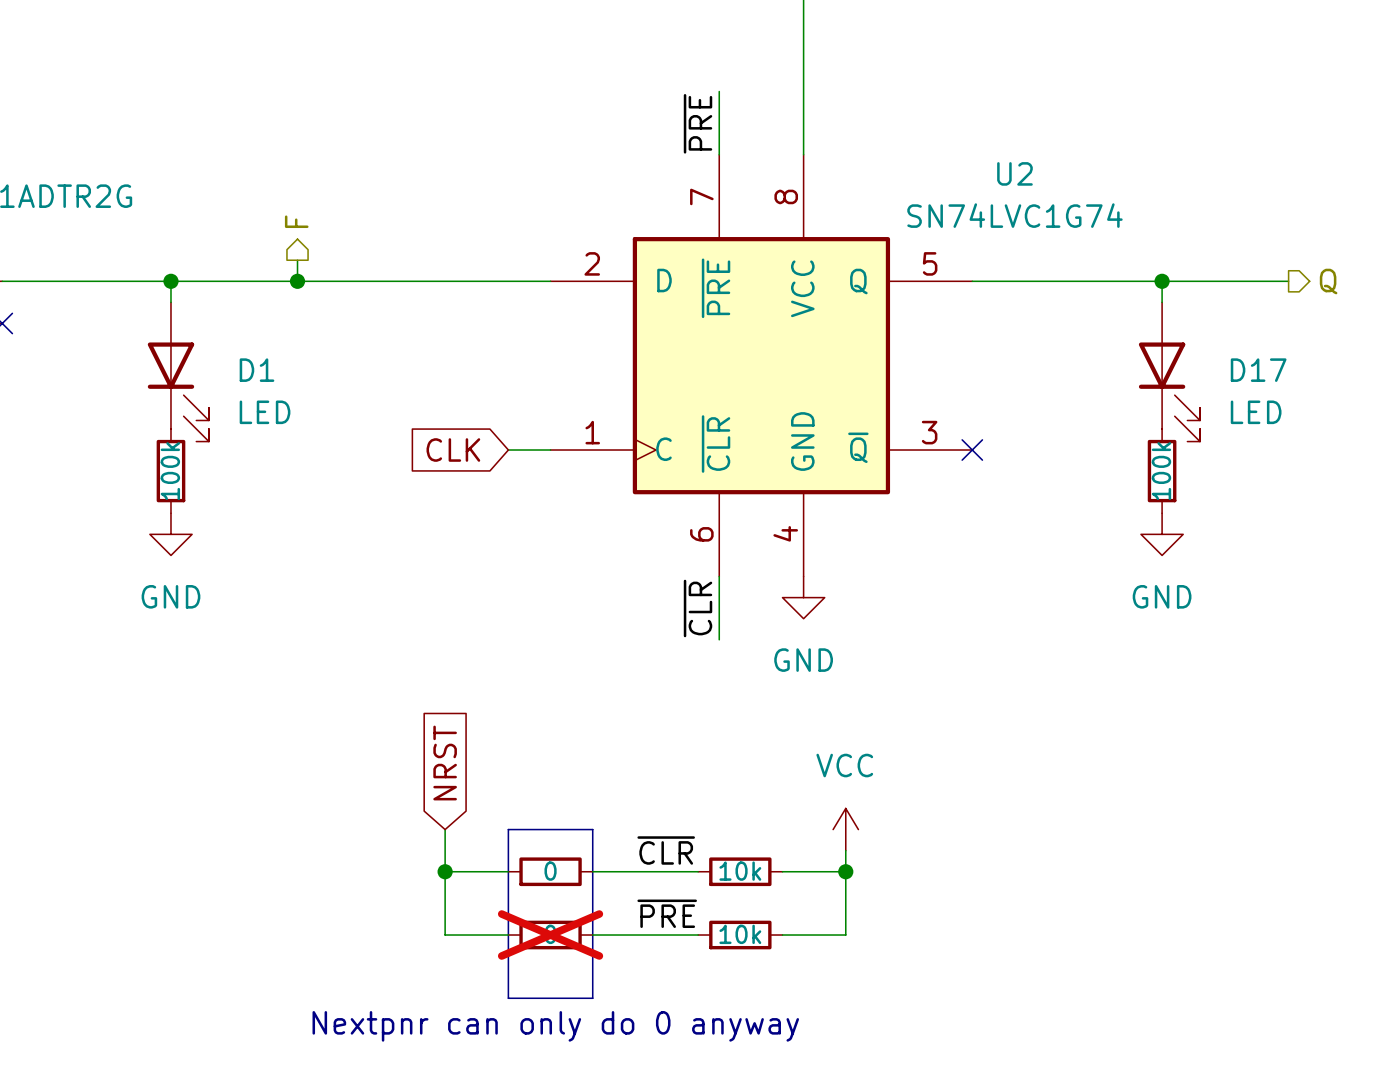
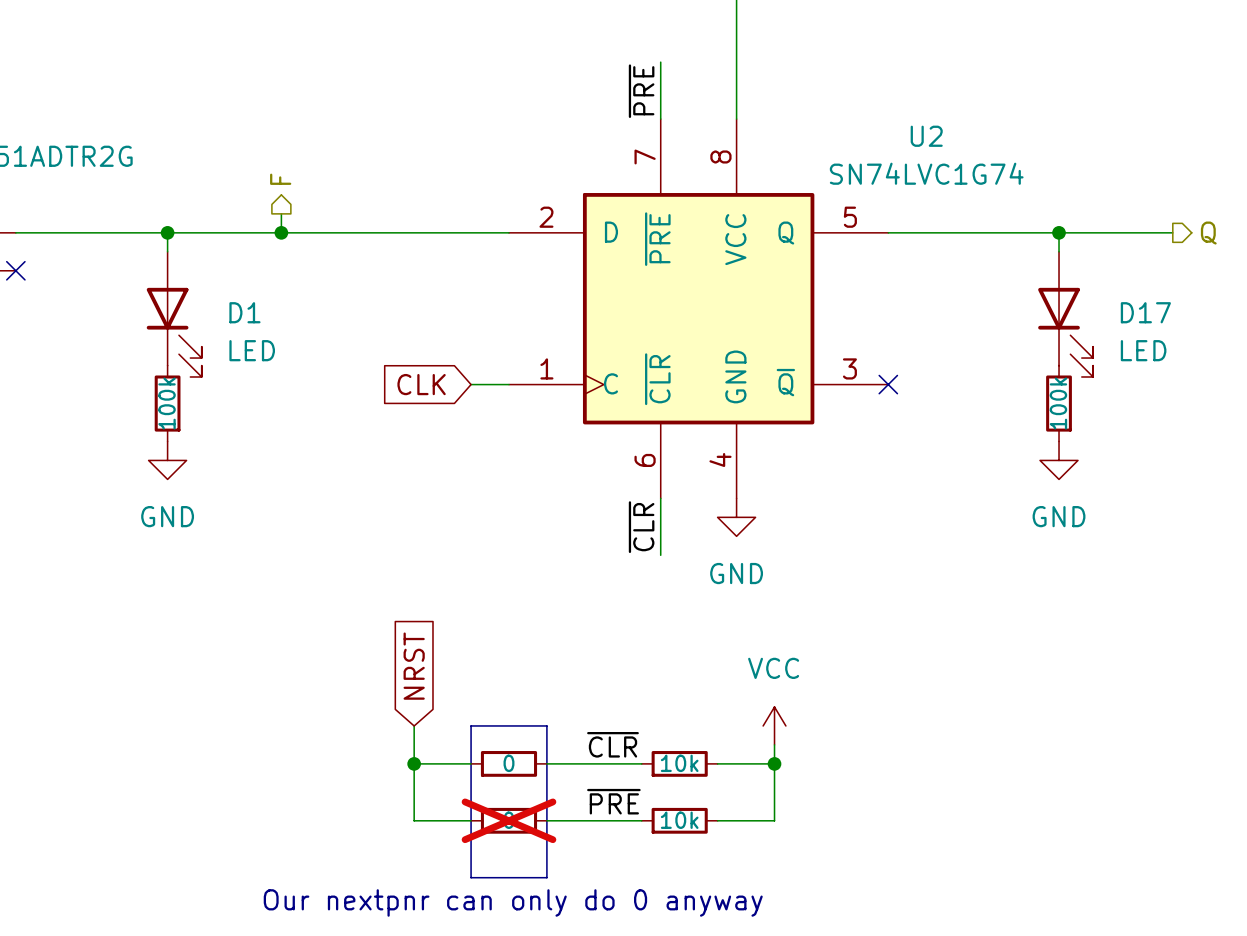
text: Nextpnr can only do 0 anyway (555, 1026) -> Our nextpnr can only do 0 anyway (513, 902)

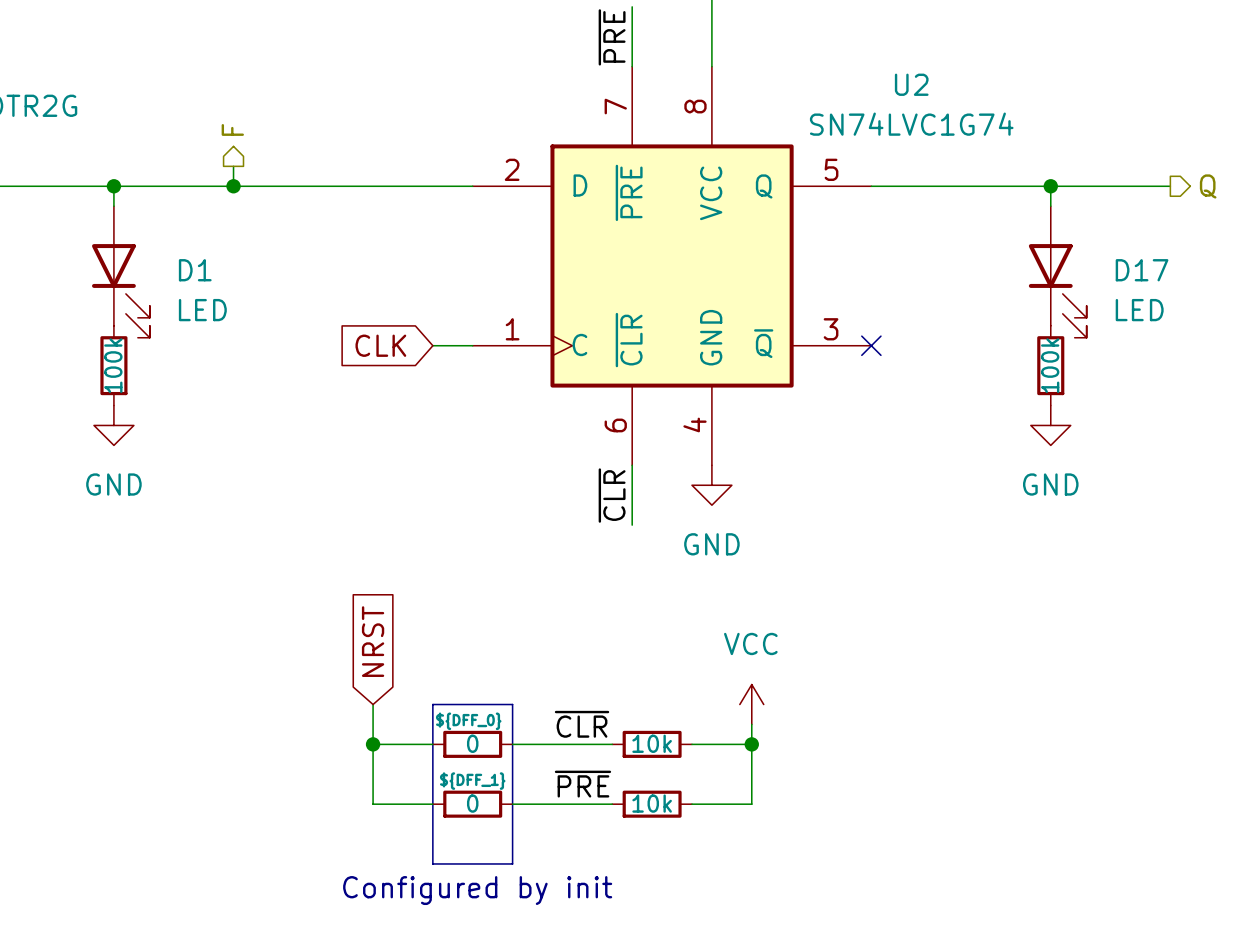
part text: none -> ${DFF_0} (468, 721)
part text: none -> ${DFF_1} (472, 781)
part do-not-place cross: (508, 820) -> none
text: Our nextpnr can only do 0 anyway (513, 902) -> Configured by init (477, 890)

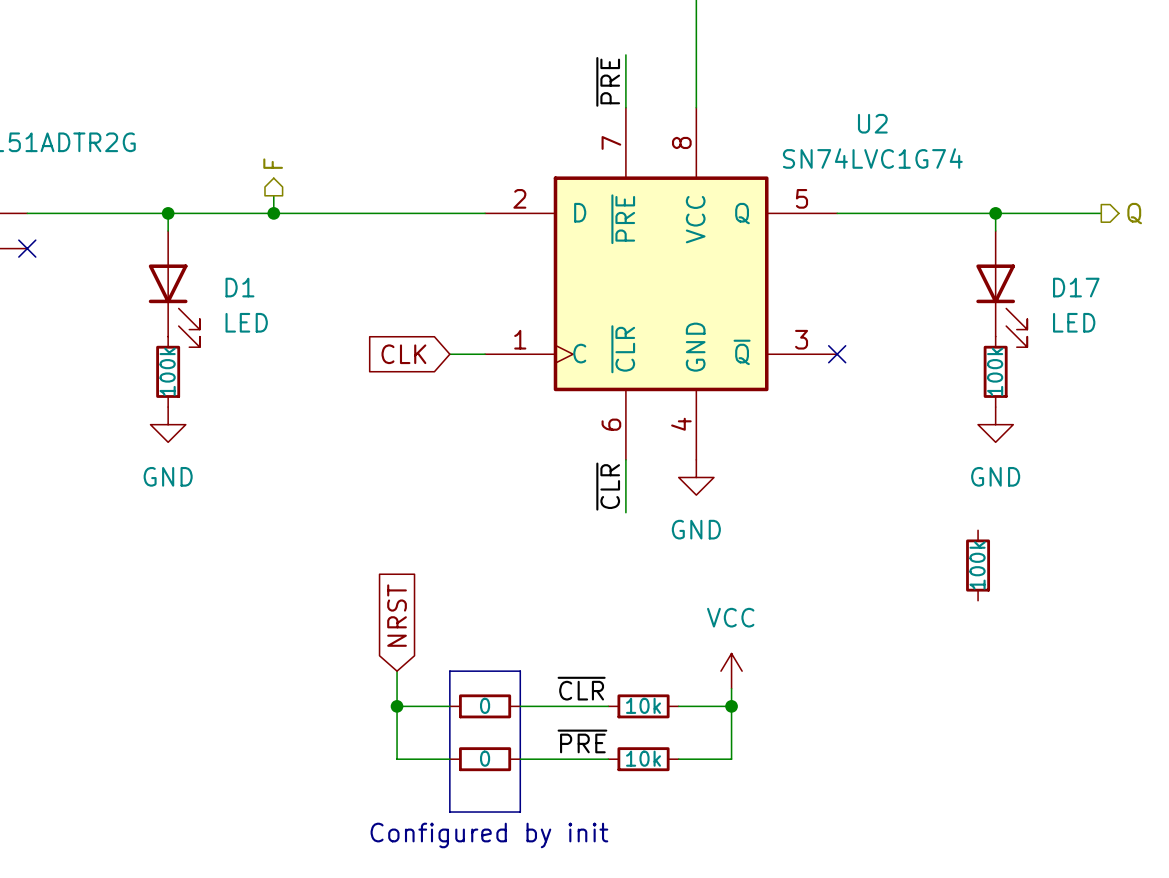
part: none -> 100k (978, 565)
part text: ${DFF_0} (468, 721) -> none
part text: ${DFF_1} (472, 781) -> none

